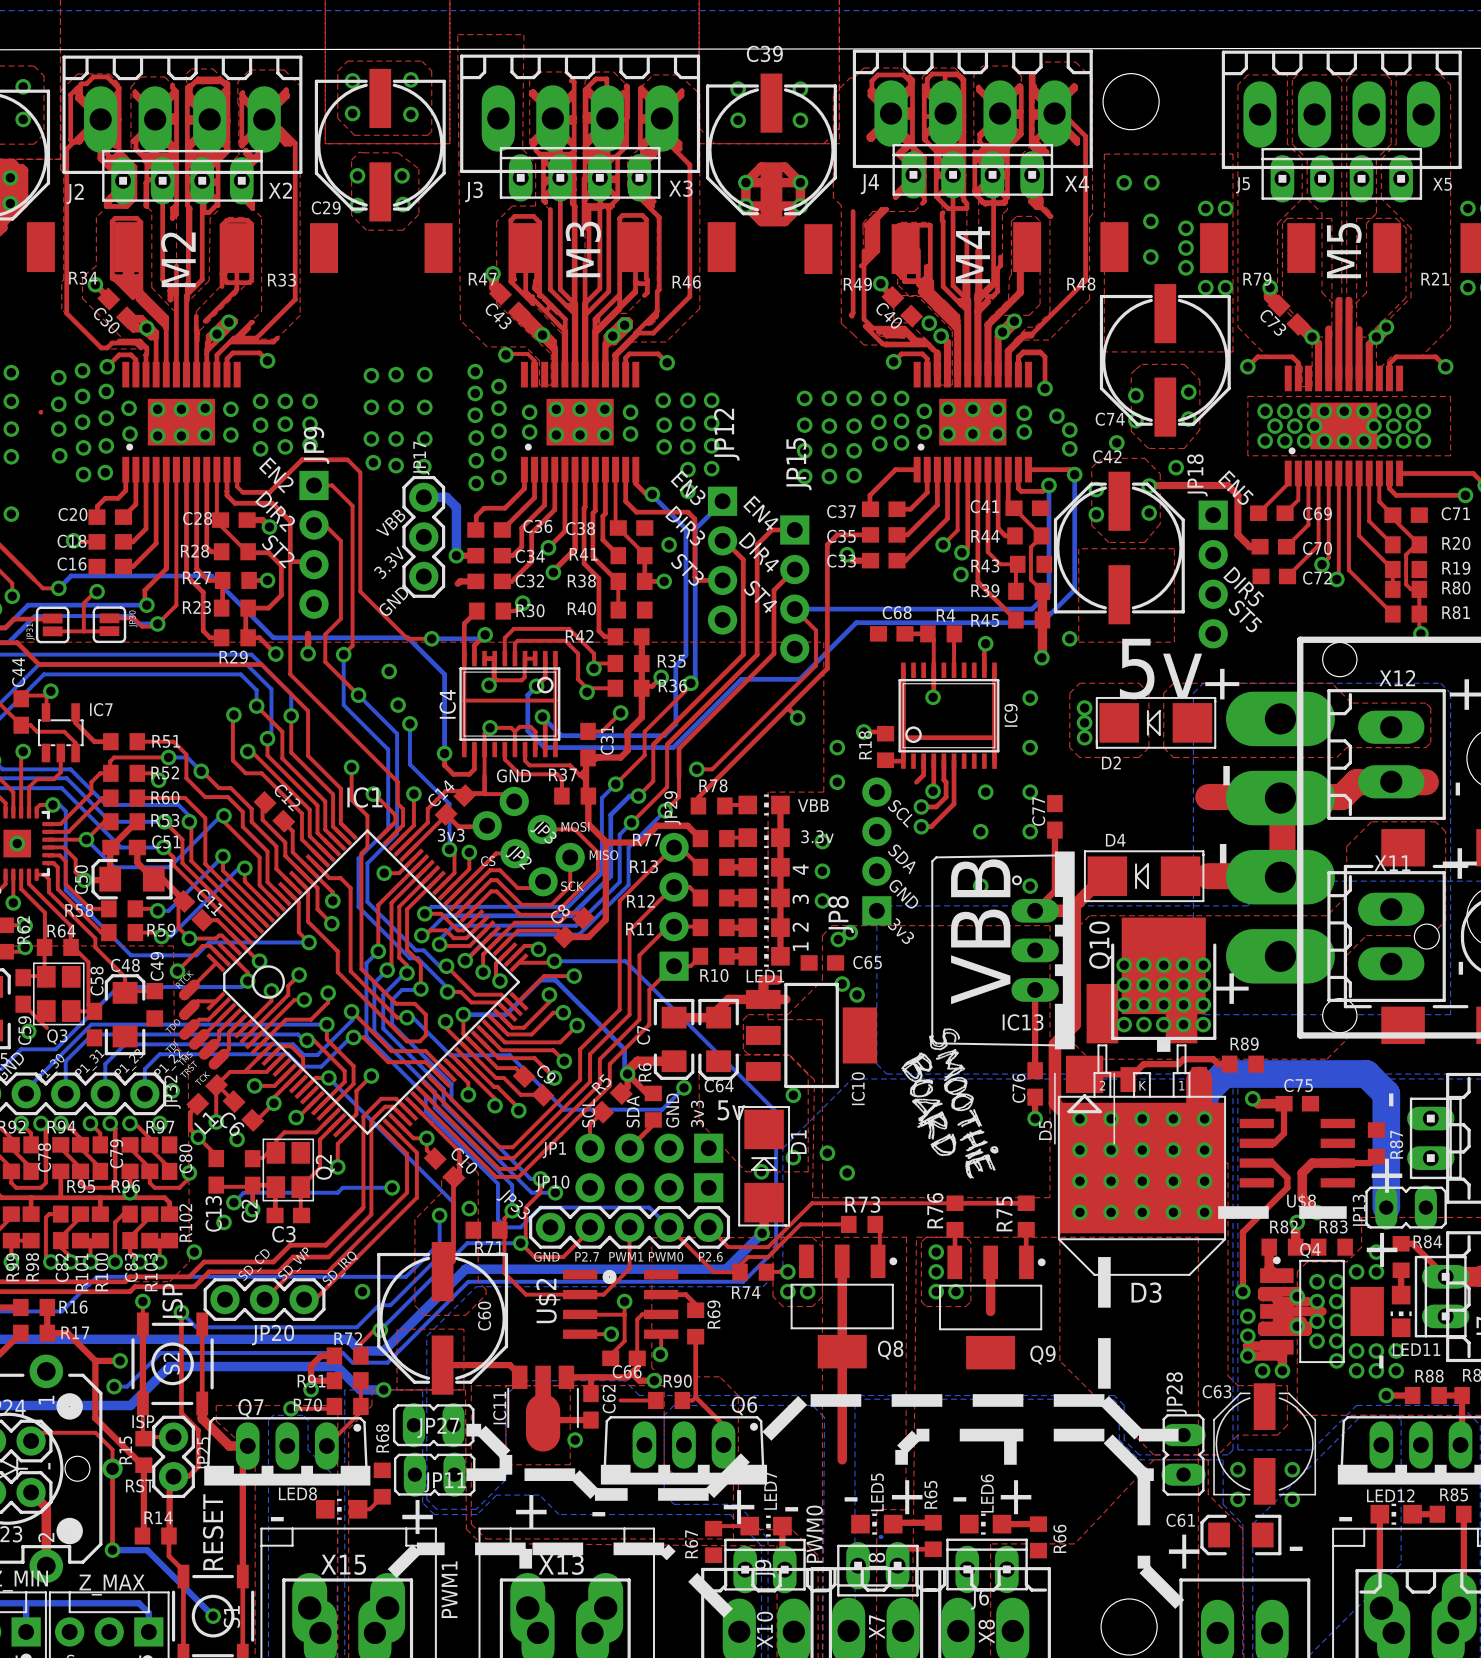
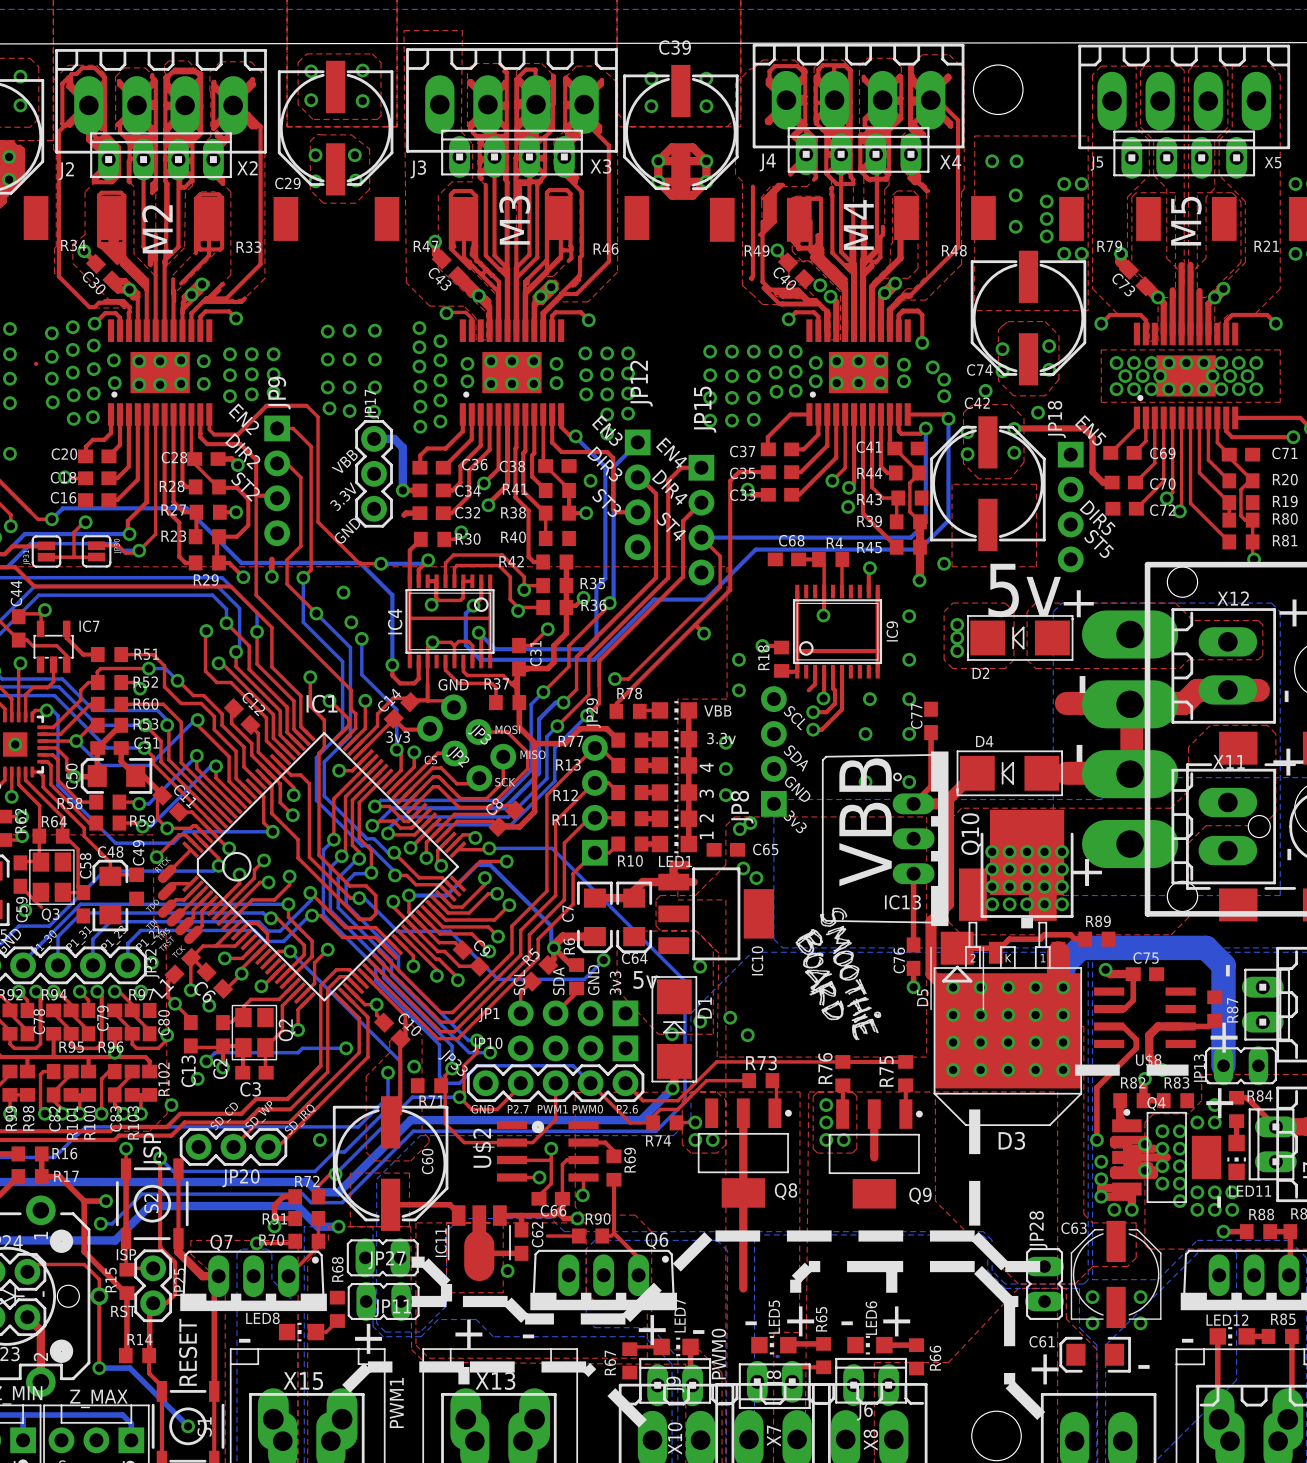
L1 name position: L1 (206, 1123) -> L1 (163, 988)

